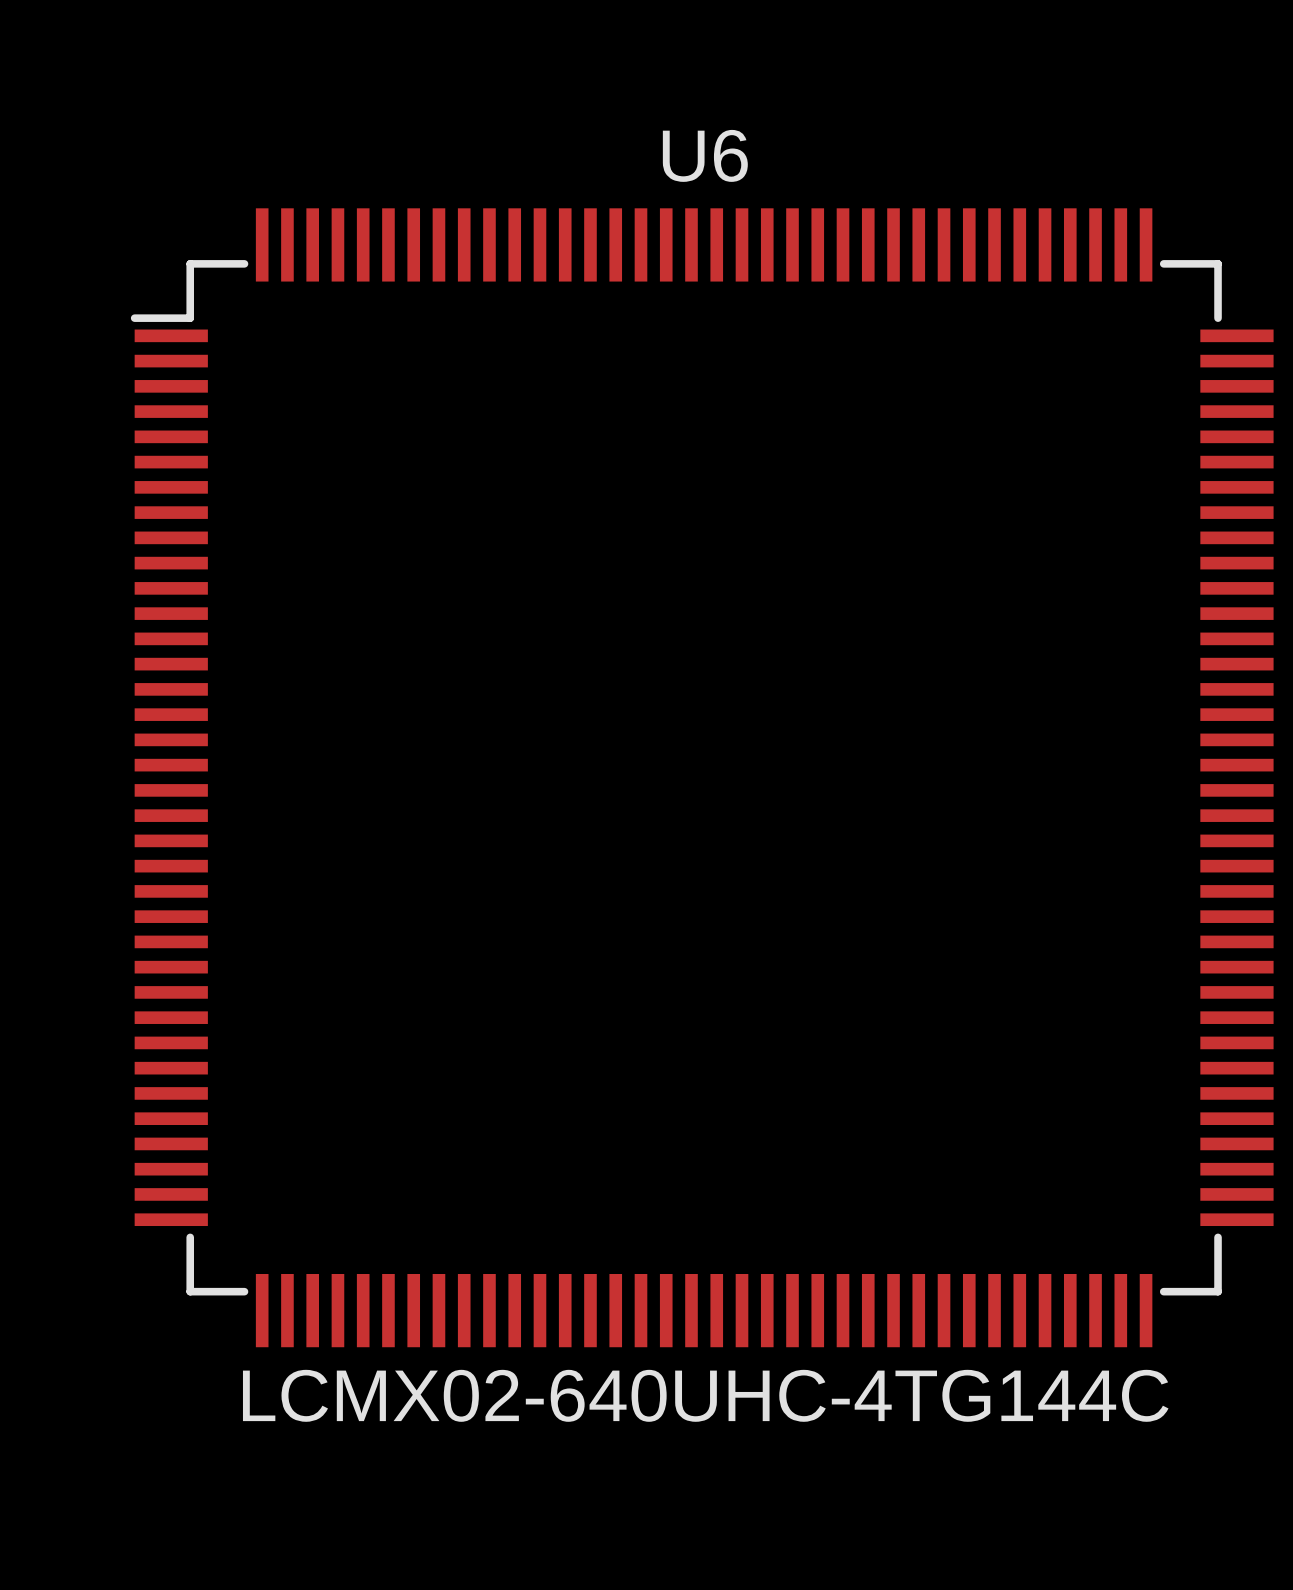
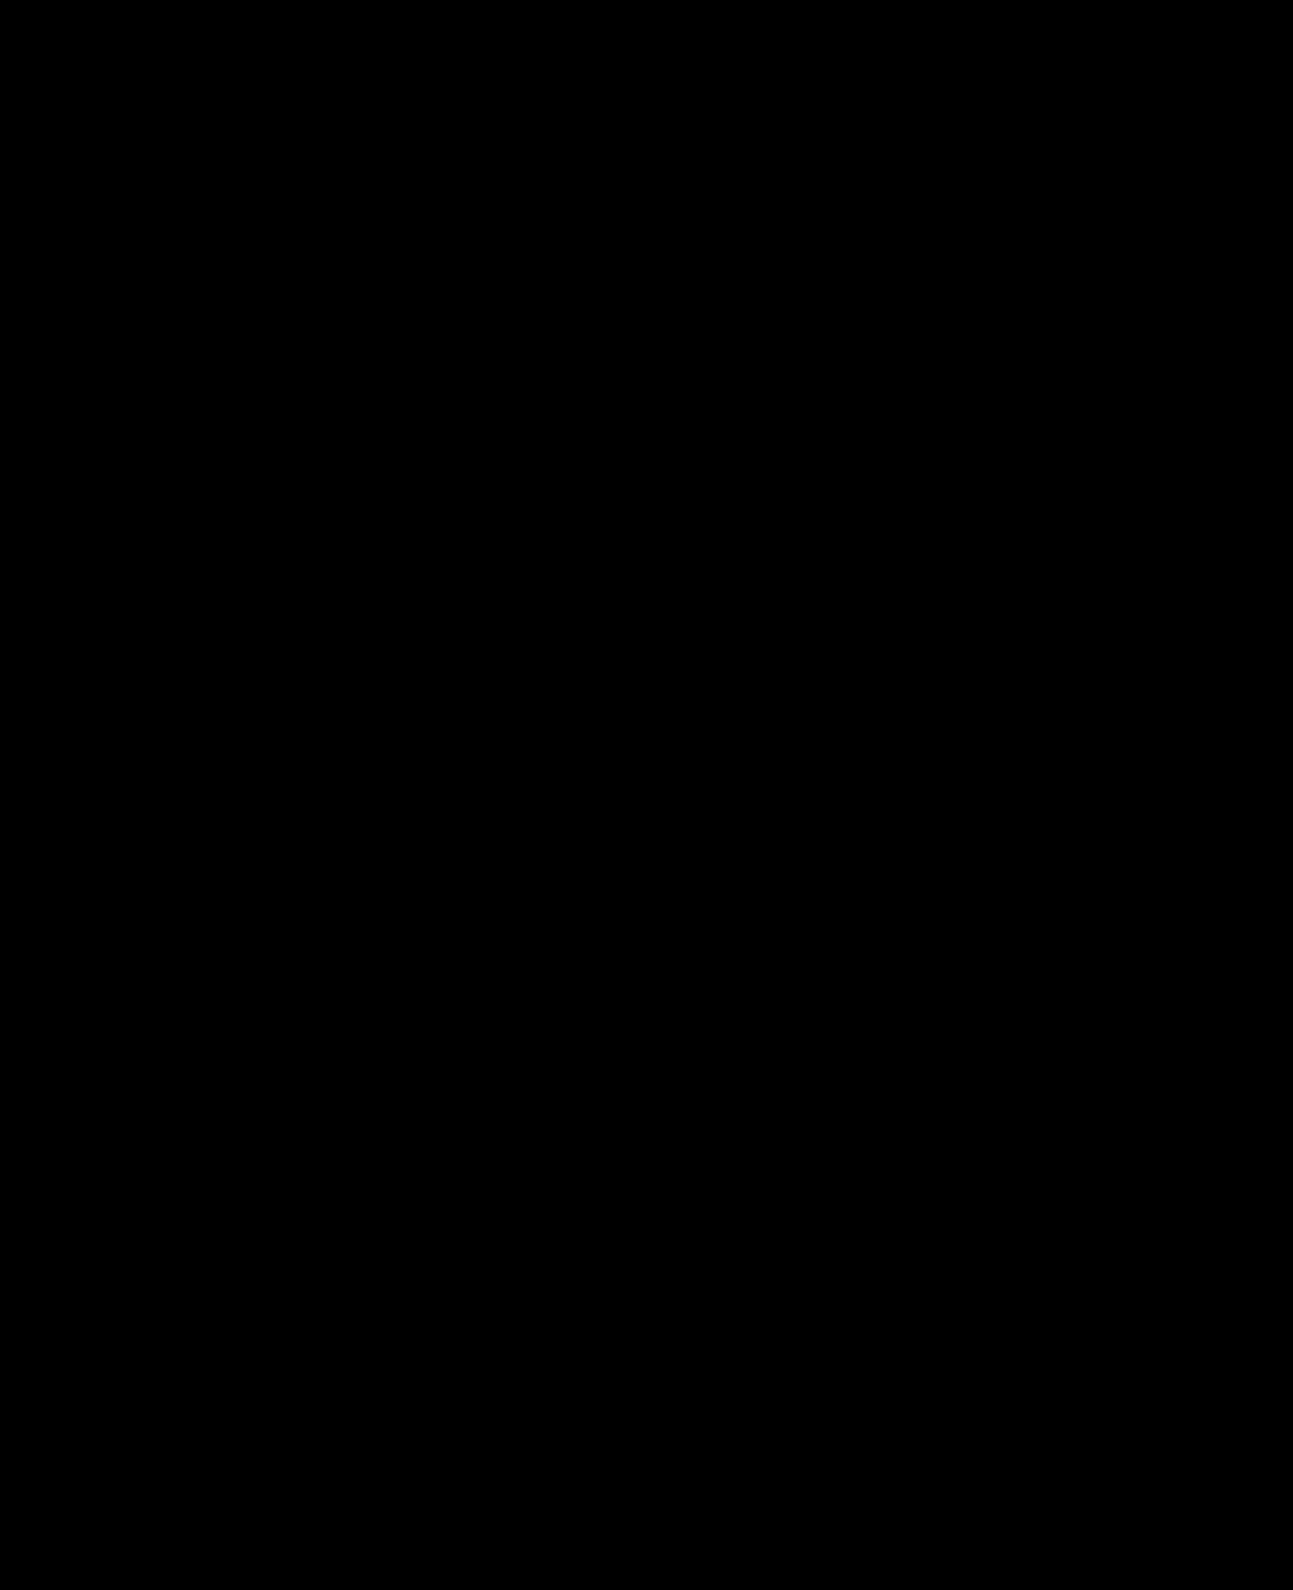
U6: LCMX02-640UHC-4TG144C (702, 777) -> none

